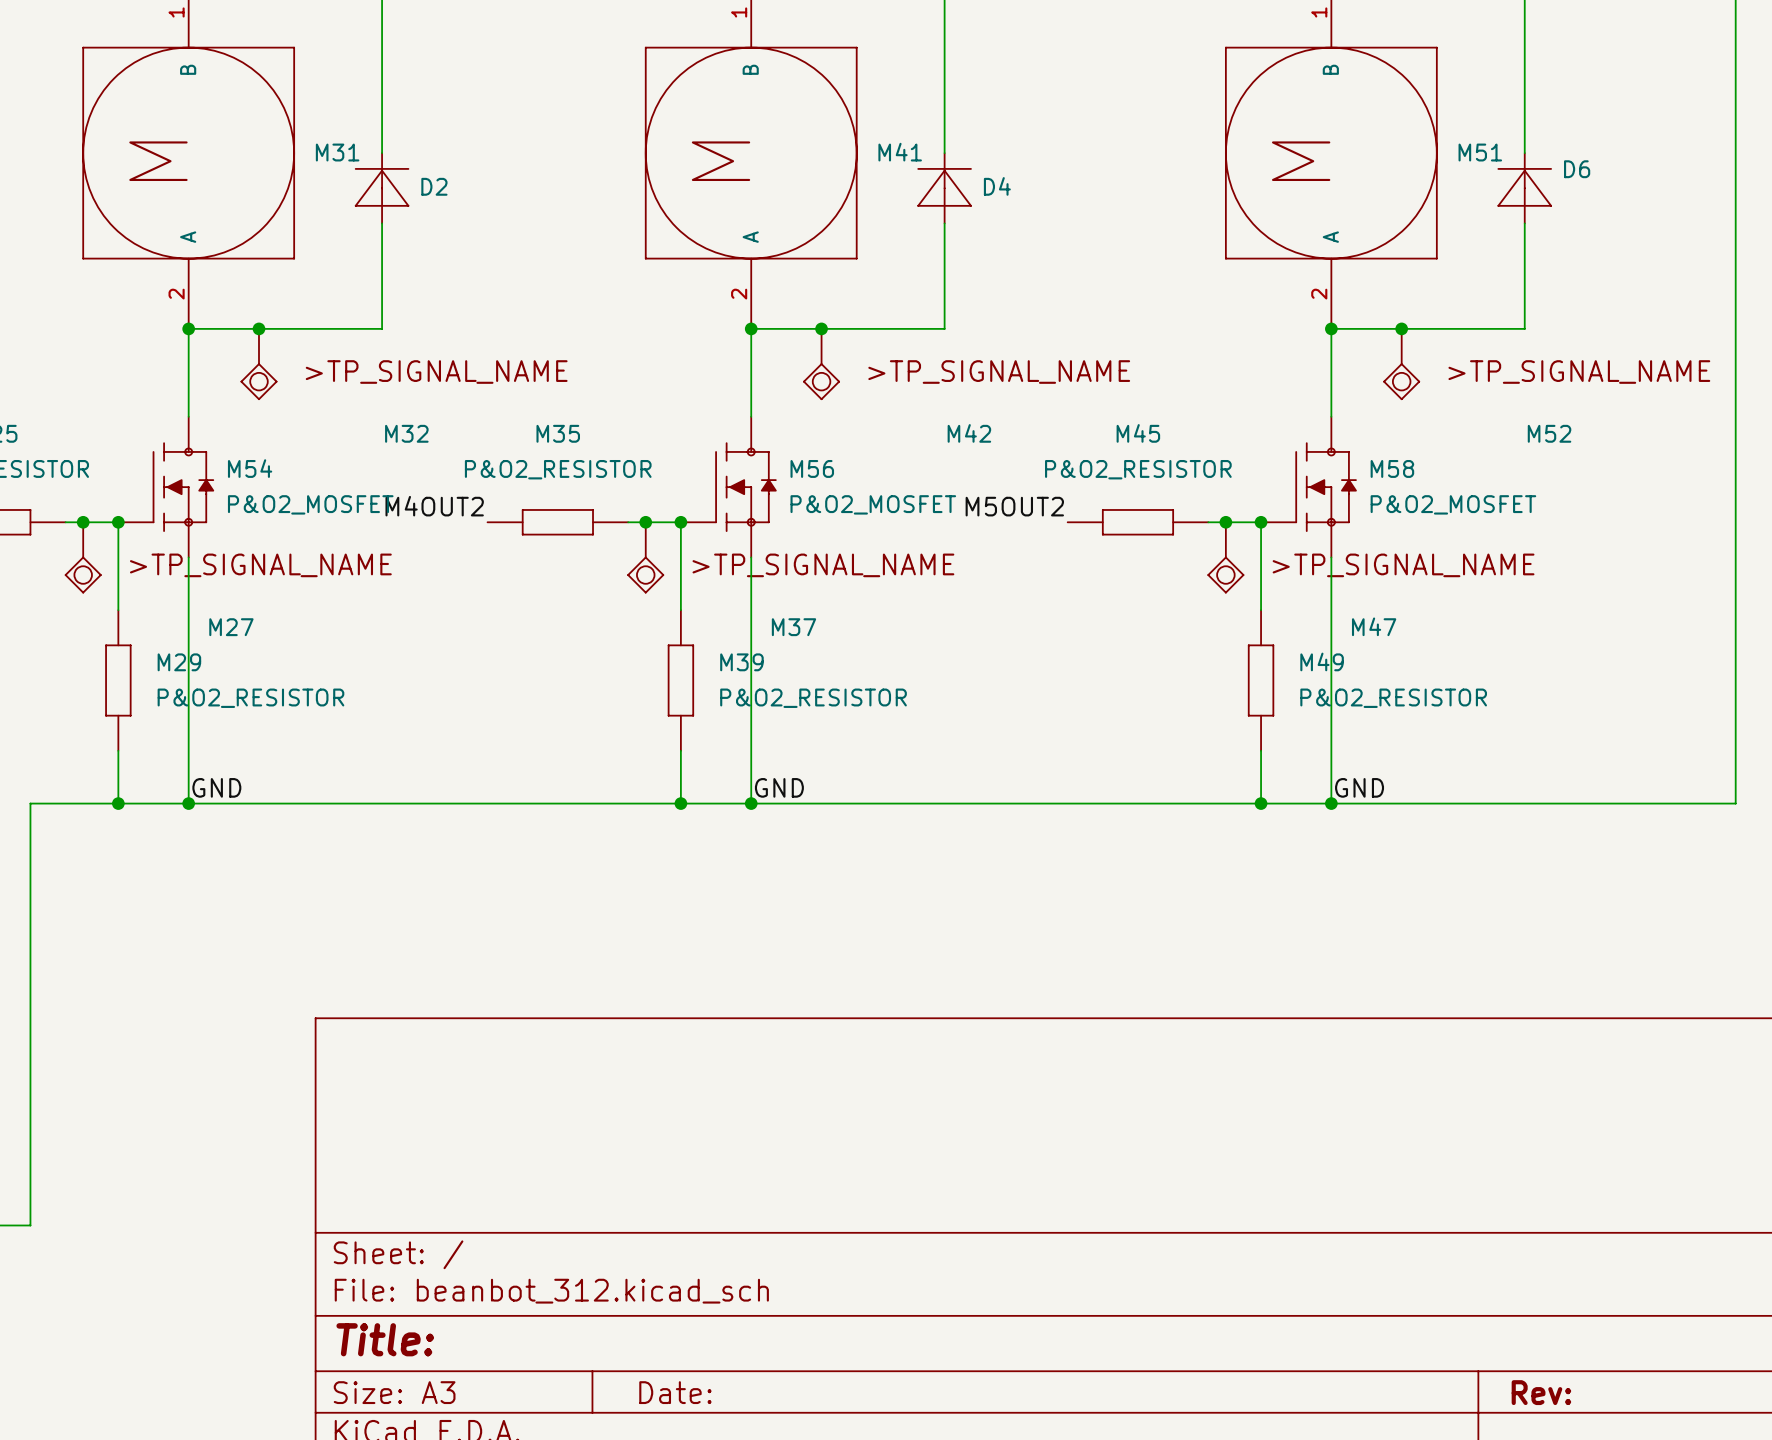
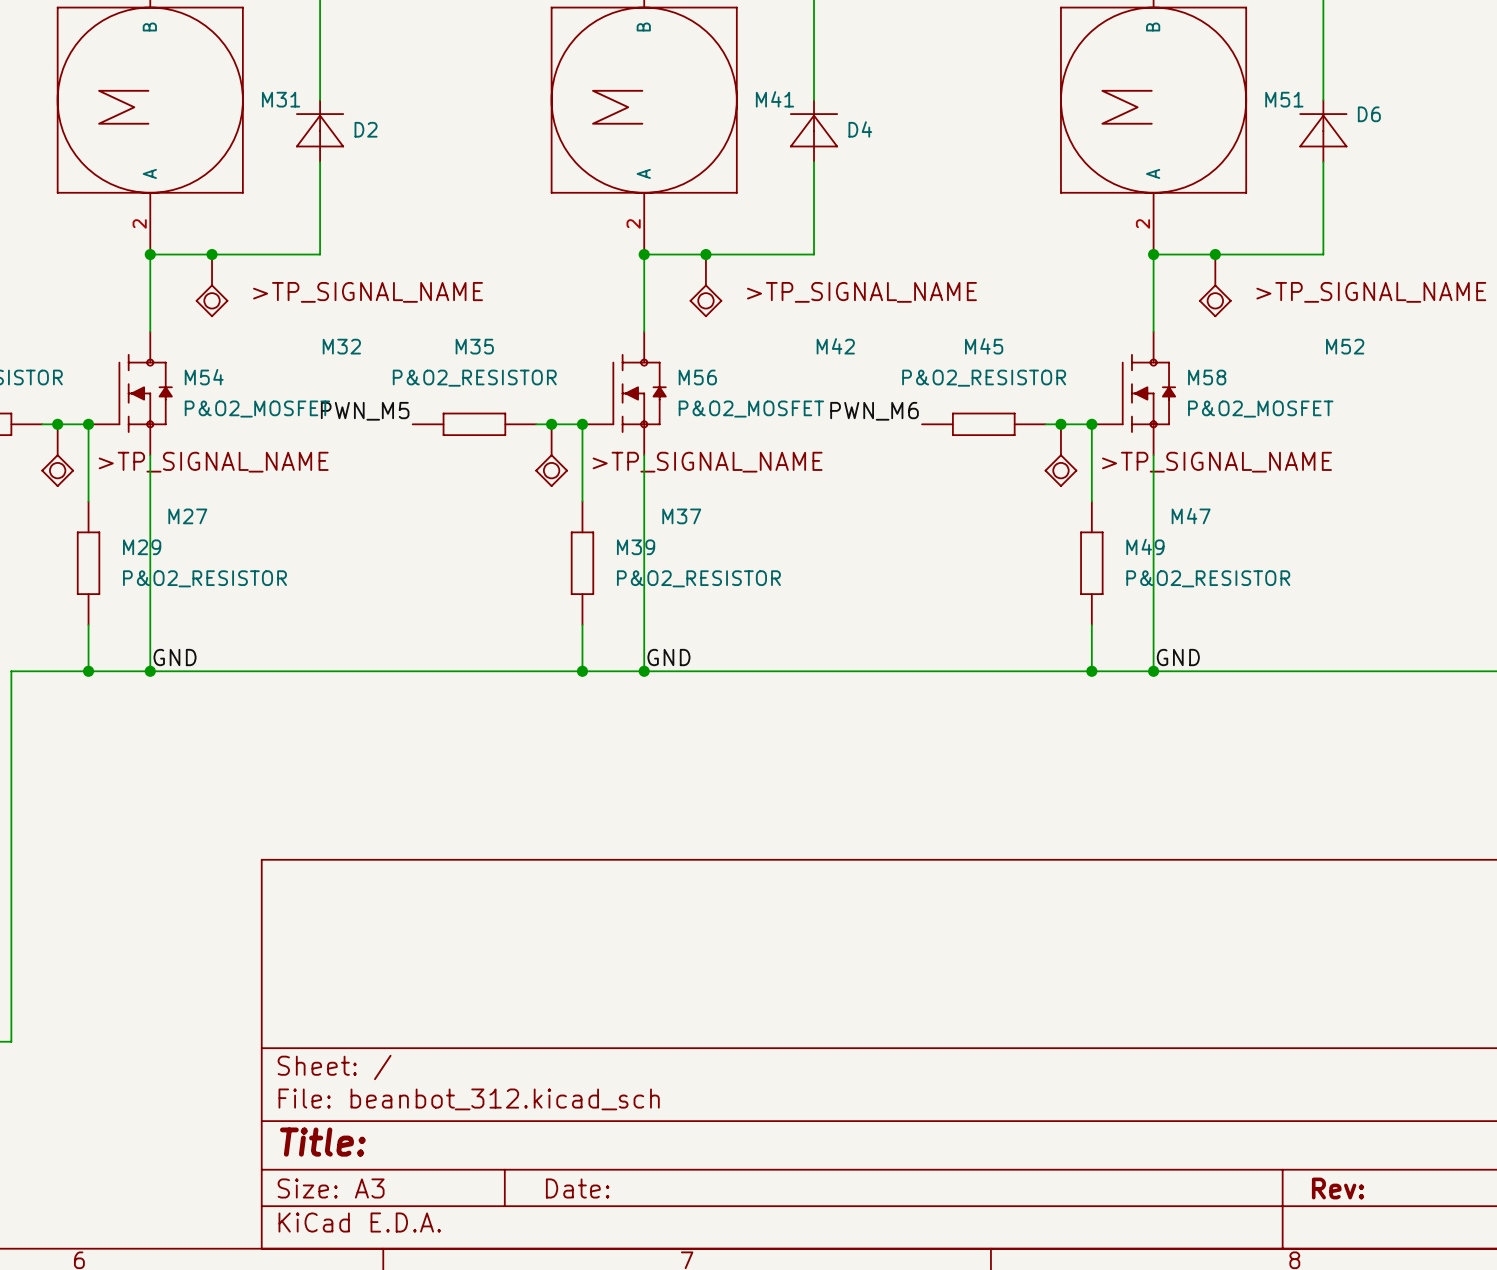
label: M4OUT2 (434, 506) -> PWN_M5 (365, 411)
label: M5OUT2 (1014, 506) -> PWN_M6 (874, 411)

